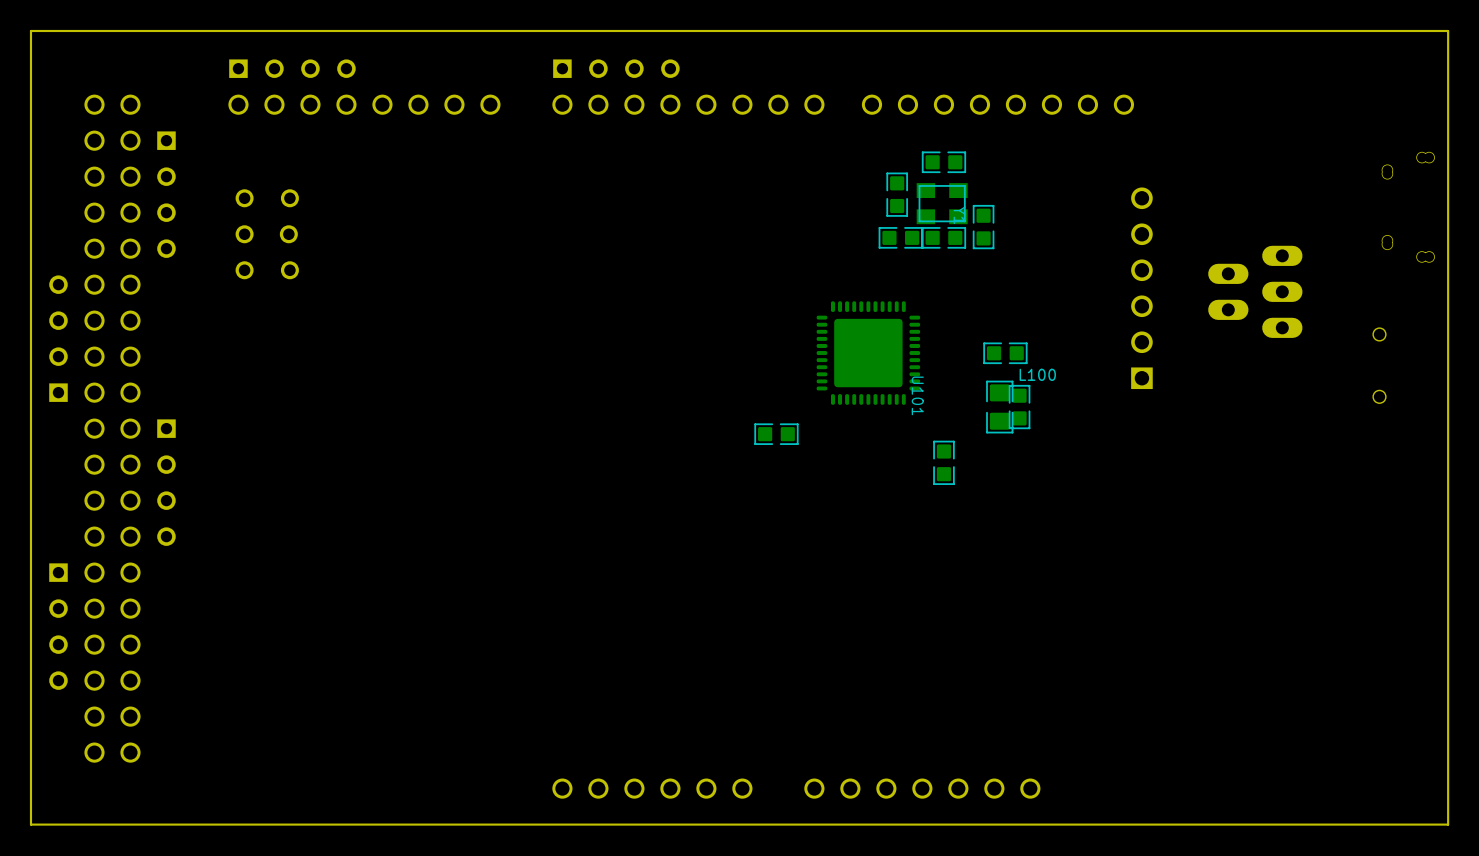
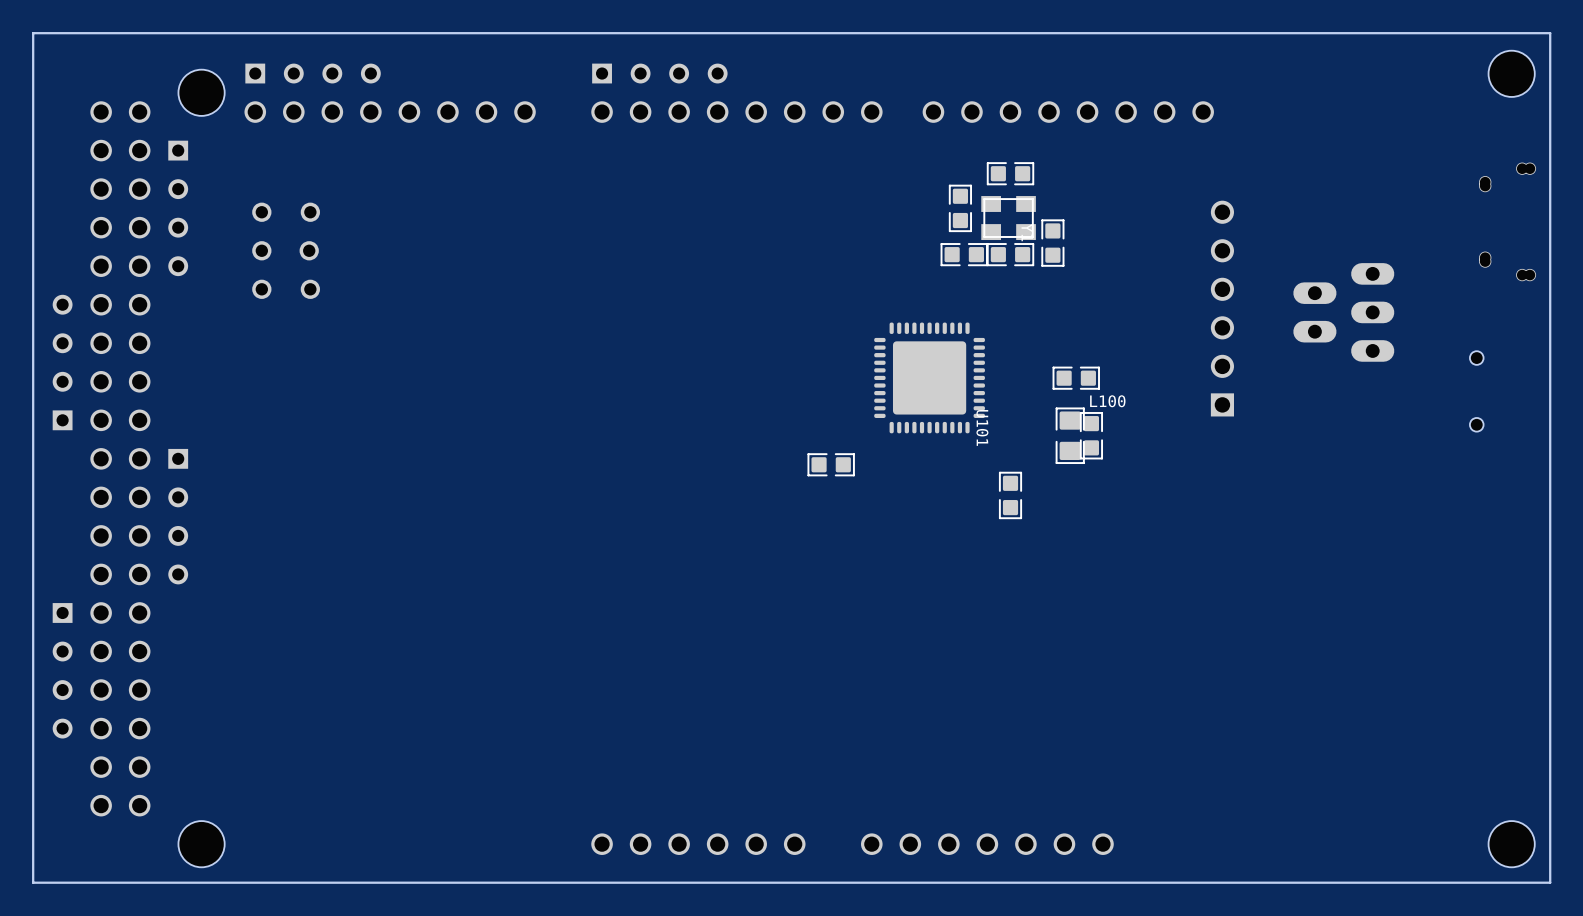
part: none -> (1511, 73)
part: none -> (201, 92)
part: none -> (201, 844)
part: none -> (1511, 844)

